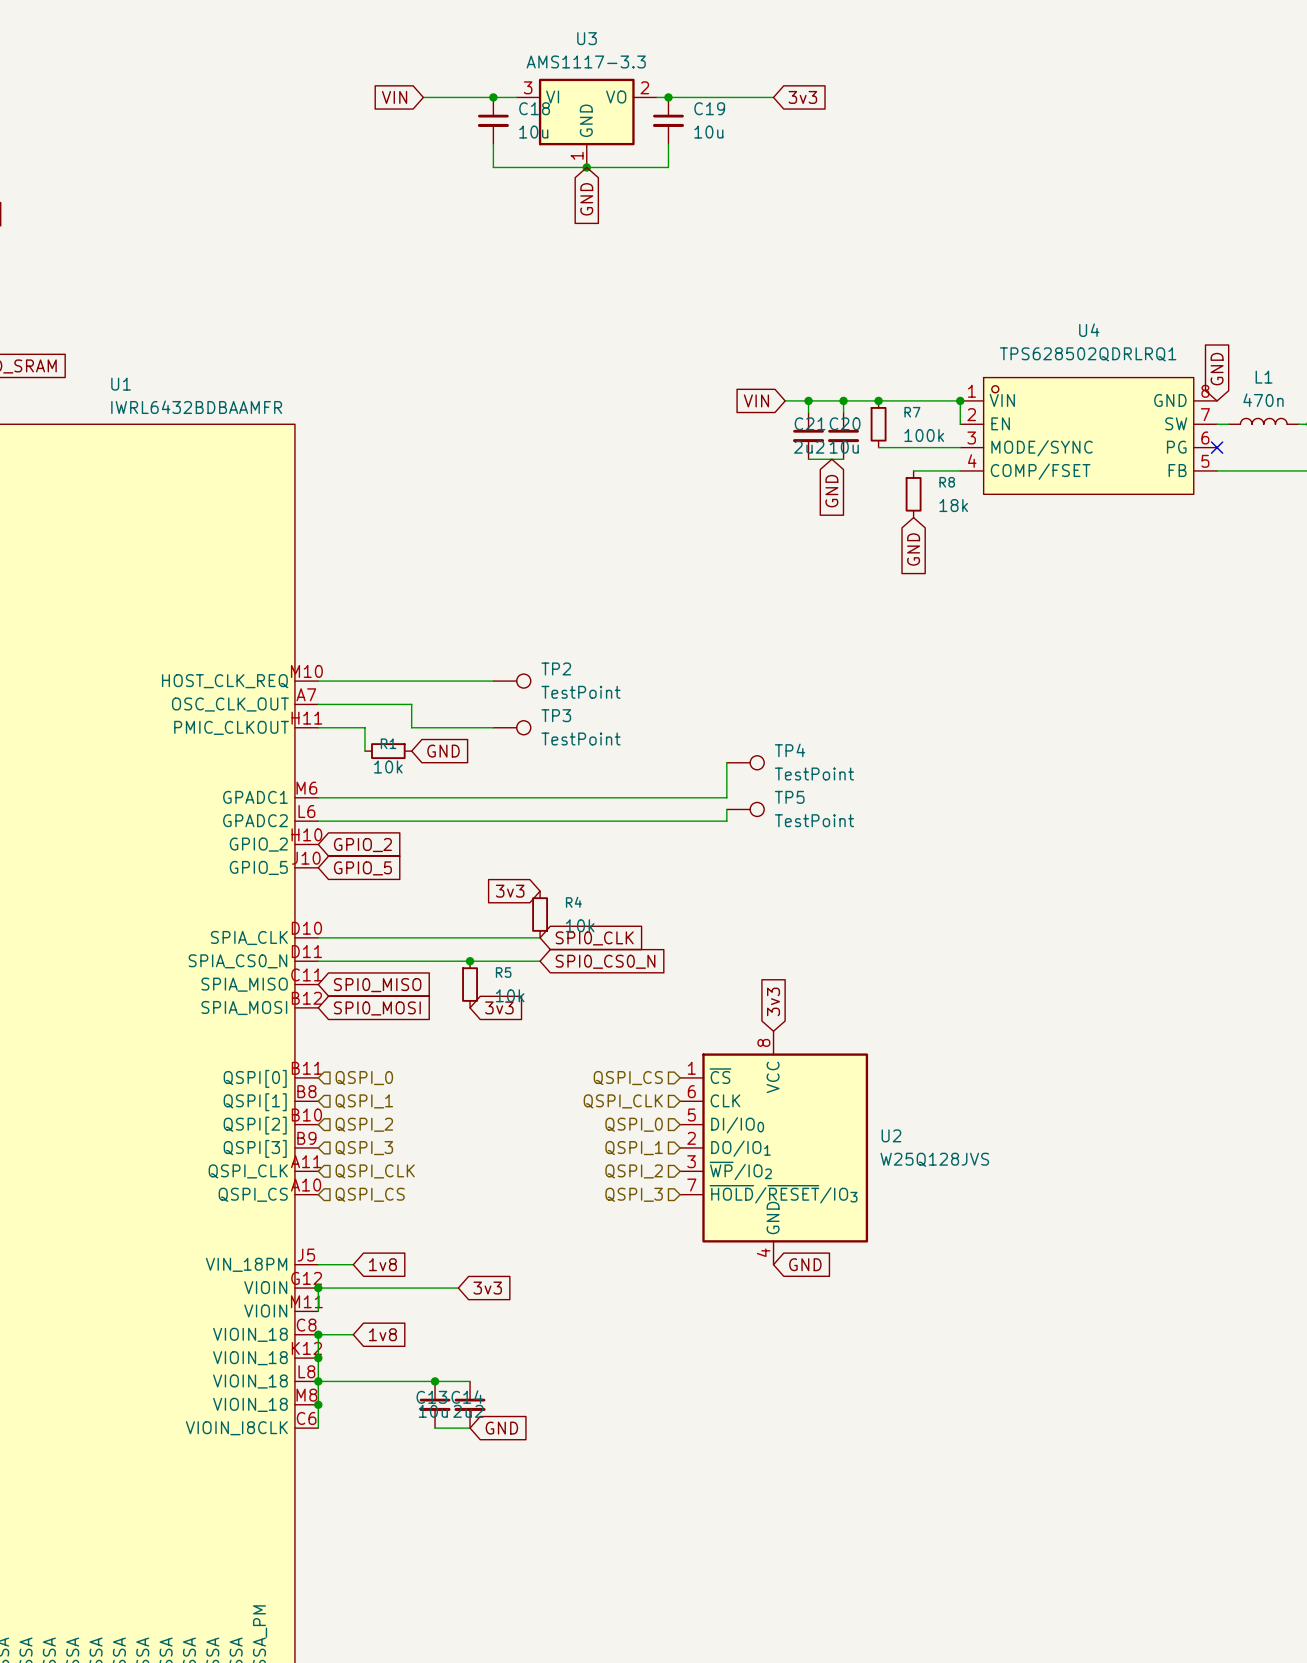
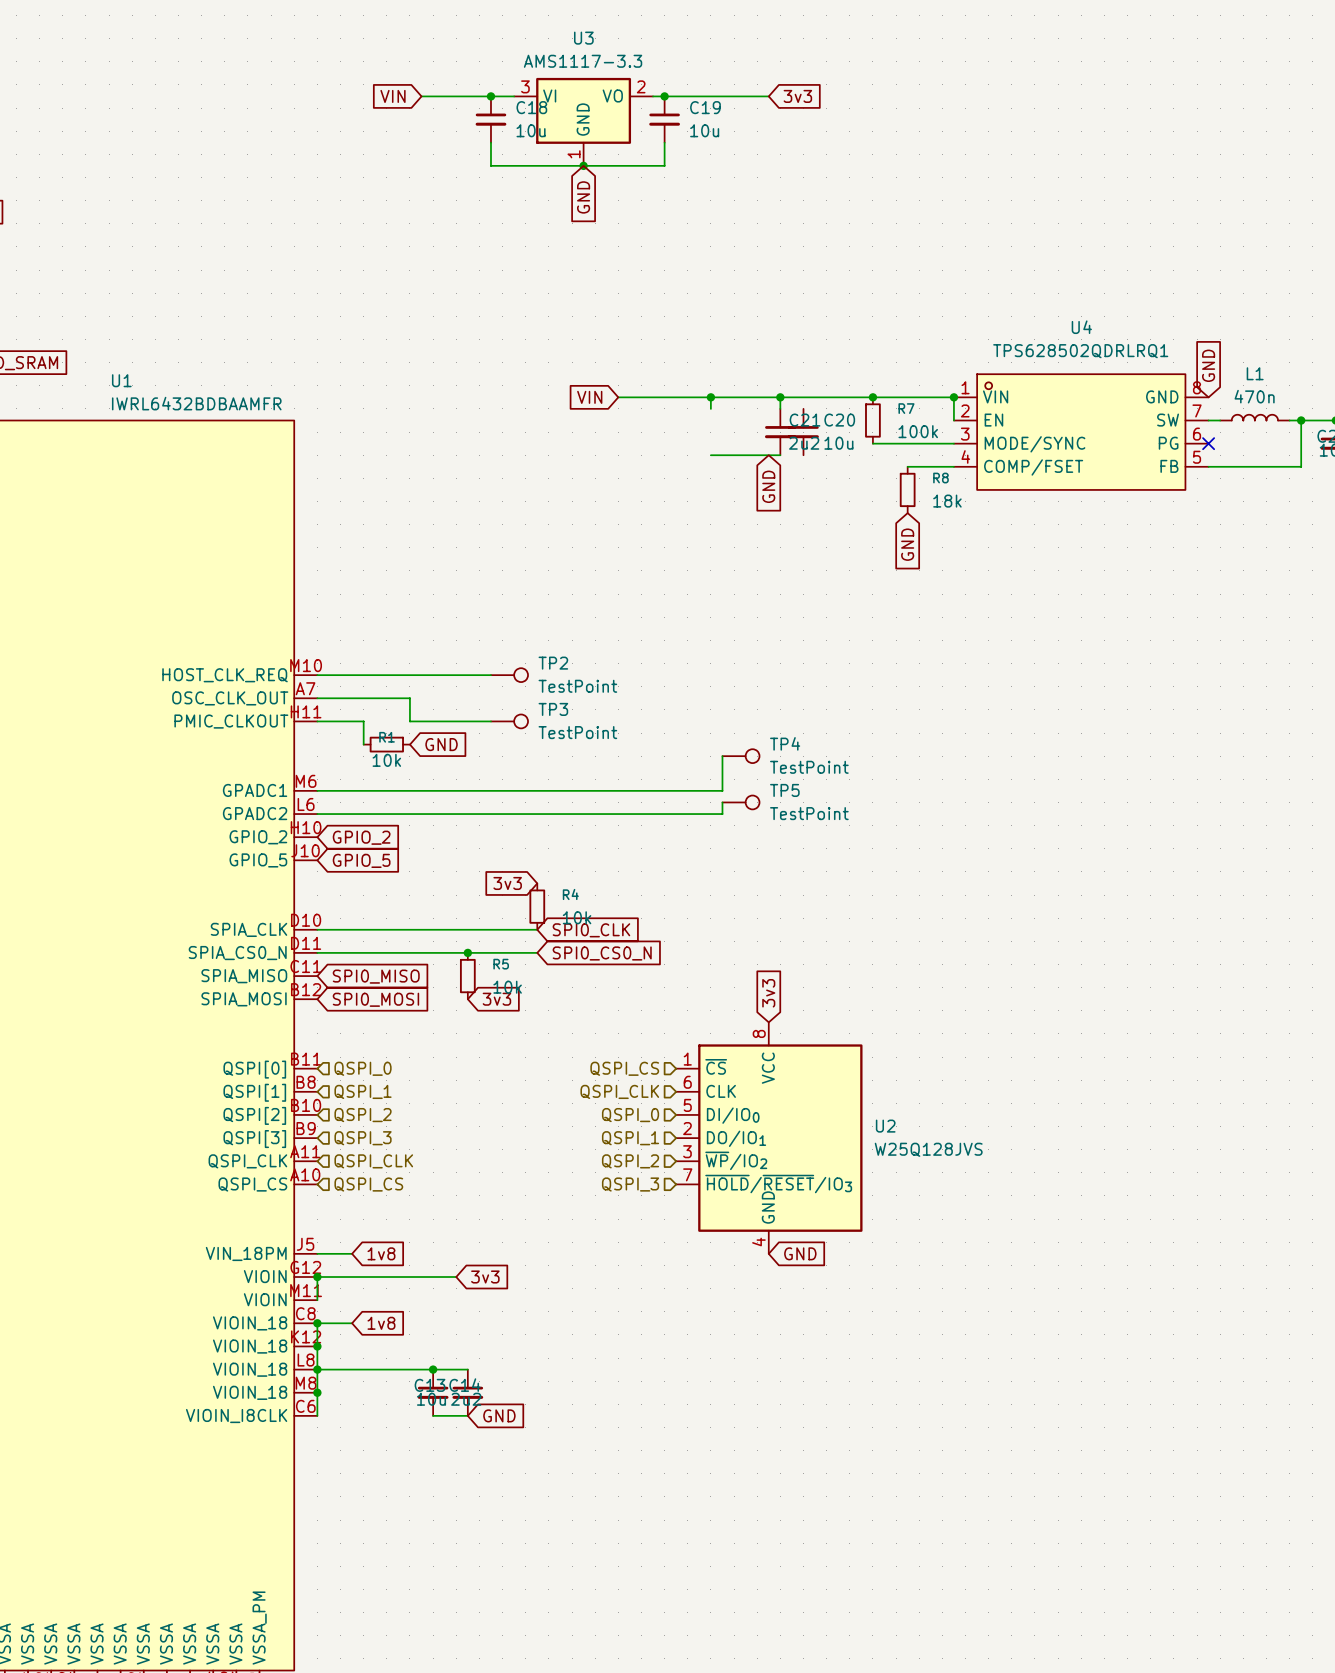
wire: none -> (618, 397) (780, 397) (780, 408)
junction: none -> (710, 397)
global label position: VIN (756, 400) -> VIN (589, 397)
wire: (808, 400) (808, 412) -> (710, 397) (710, 408)
junction position: (808, 400) -> (780, 397)
wire: (843, 400) (843, 412) -> none
junction: (843, 400) -> none
C20 position: (843, 435) -> (780, 432)
wire: none -> (710, 455) (780, 455)
wire: (808, 459) (843, 459) -> none
global label position: GND (831, 491) -> GND (768, 486)

